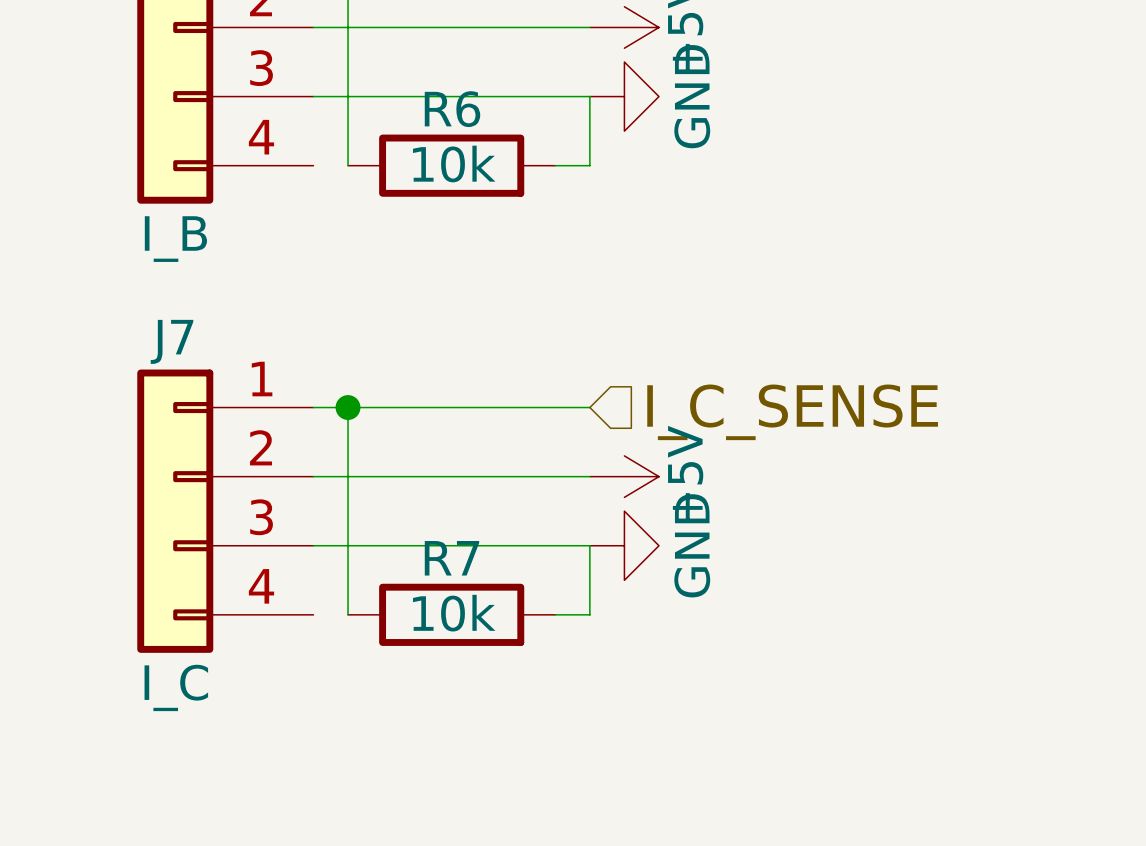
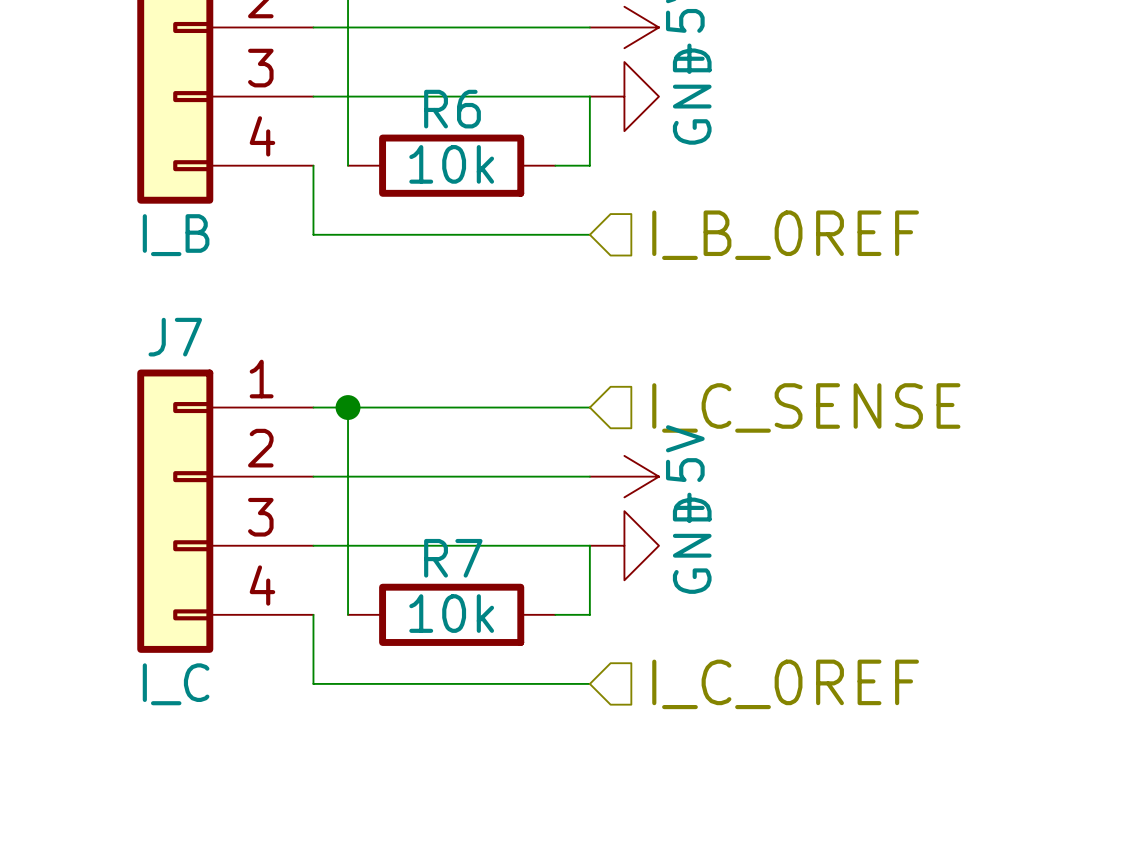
wire: none -> (313, 165) (313, 234) (589, 234)
hierarchical label: none -> I_B_0REF (785, 235)
wire: none -> (313, 614) (313, 683) (589, 683)
hierarchical label: none -> I_C_0REF (785, 684)

